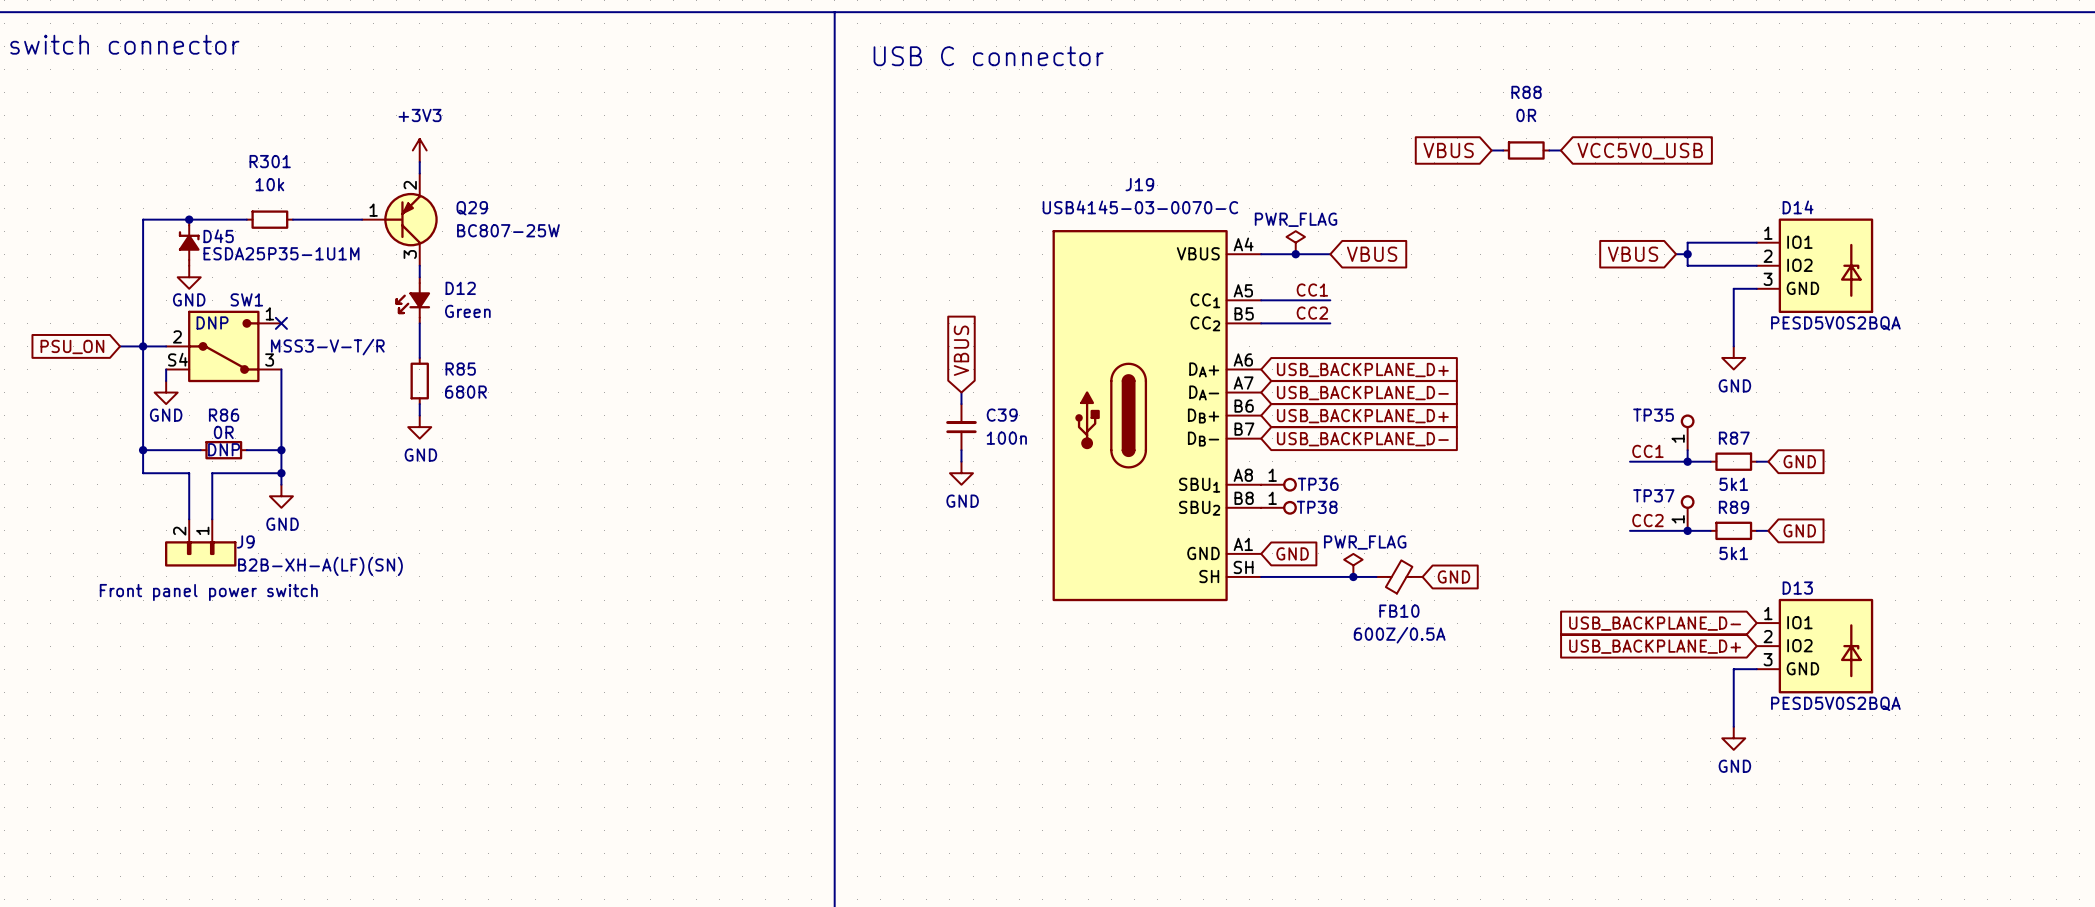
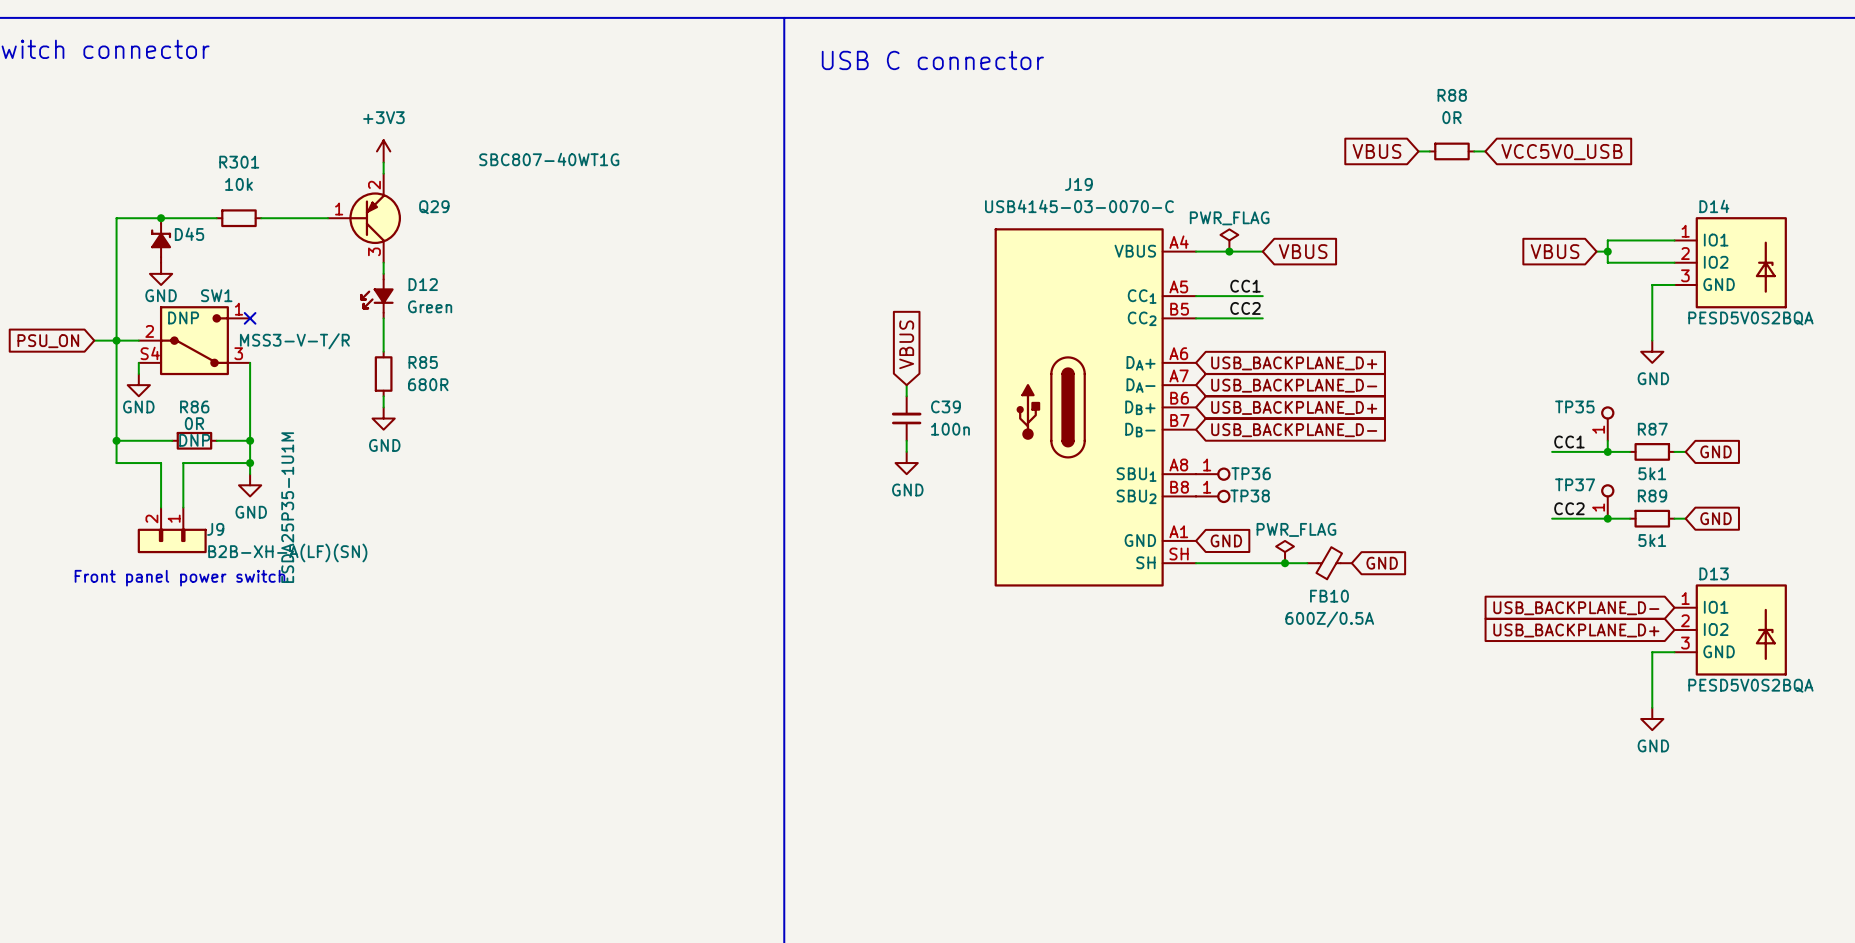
Q29 text: none -> SBC807-40WT1G (549, 159)
Q29 value: BC807-25W (508, 230) -> none
D45 value: ESDA25P35-1U1M (281, 253) -> none
D45 text: none -> ESDA25P35-1U1M (287, 507)

